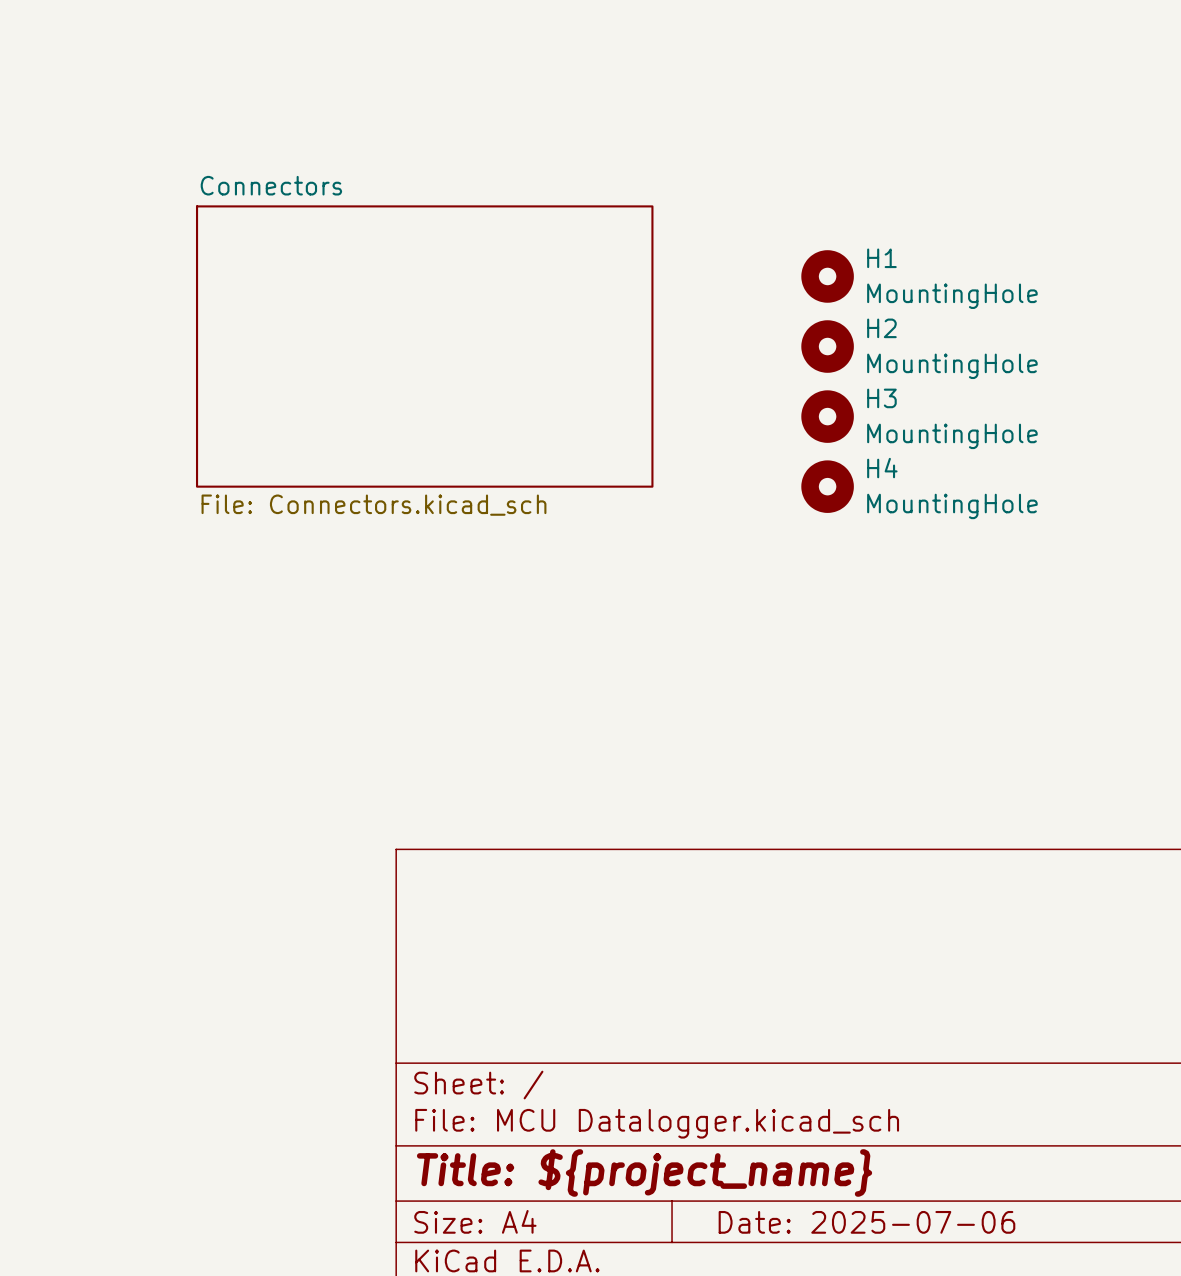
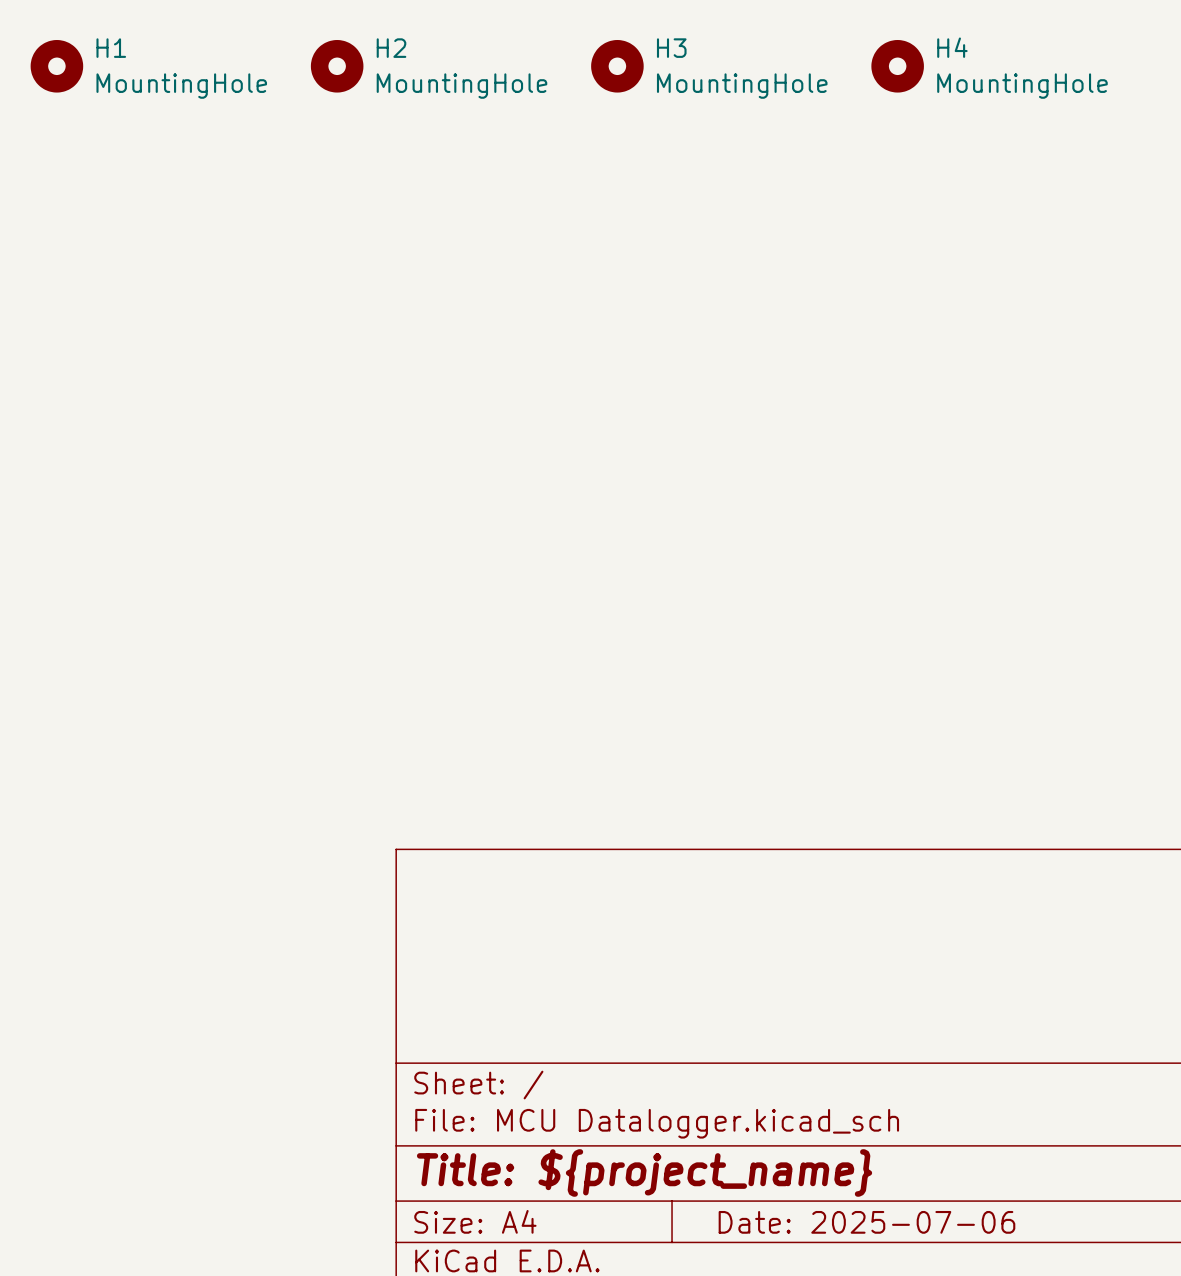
H1 position: (827, 276) -> (56, 66)
sheet Connectors: File: Connectors.kicad_sch (424, 346) -> none
H2 position: (827, 346) -> (337, 66)
H3 position: (827, 416) -> (617, 66)
H4 position: (827, 486) -> (897, 66)

